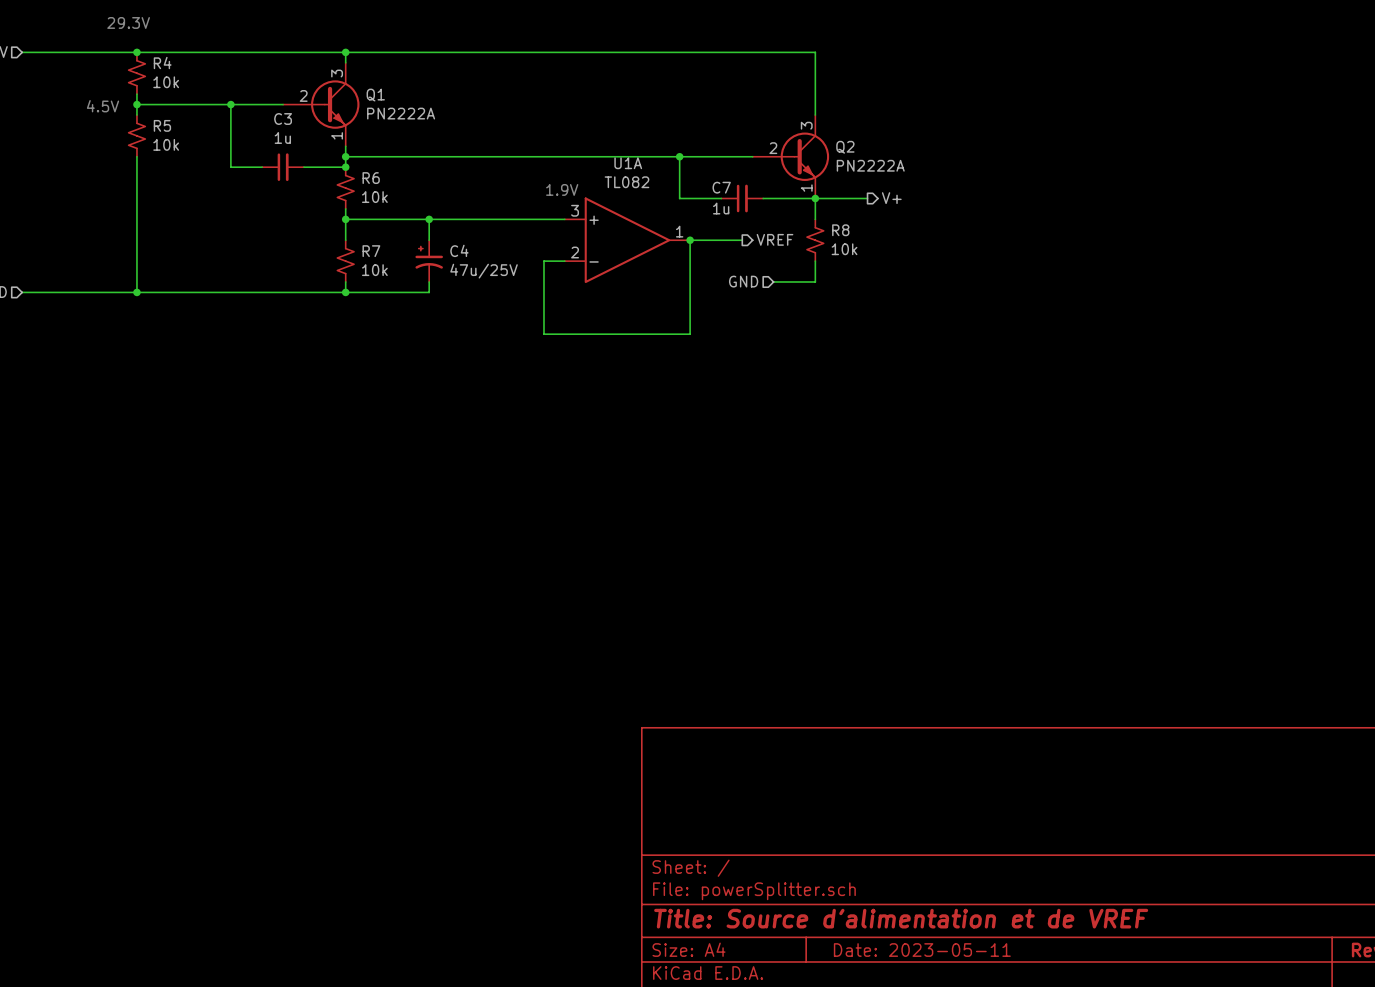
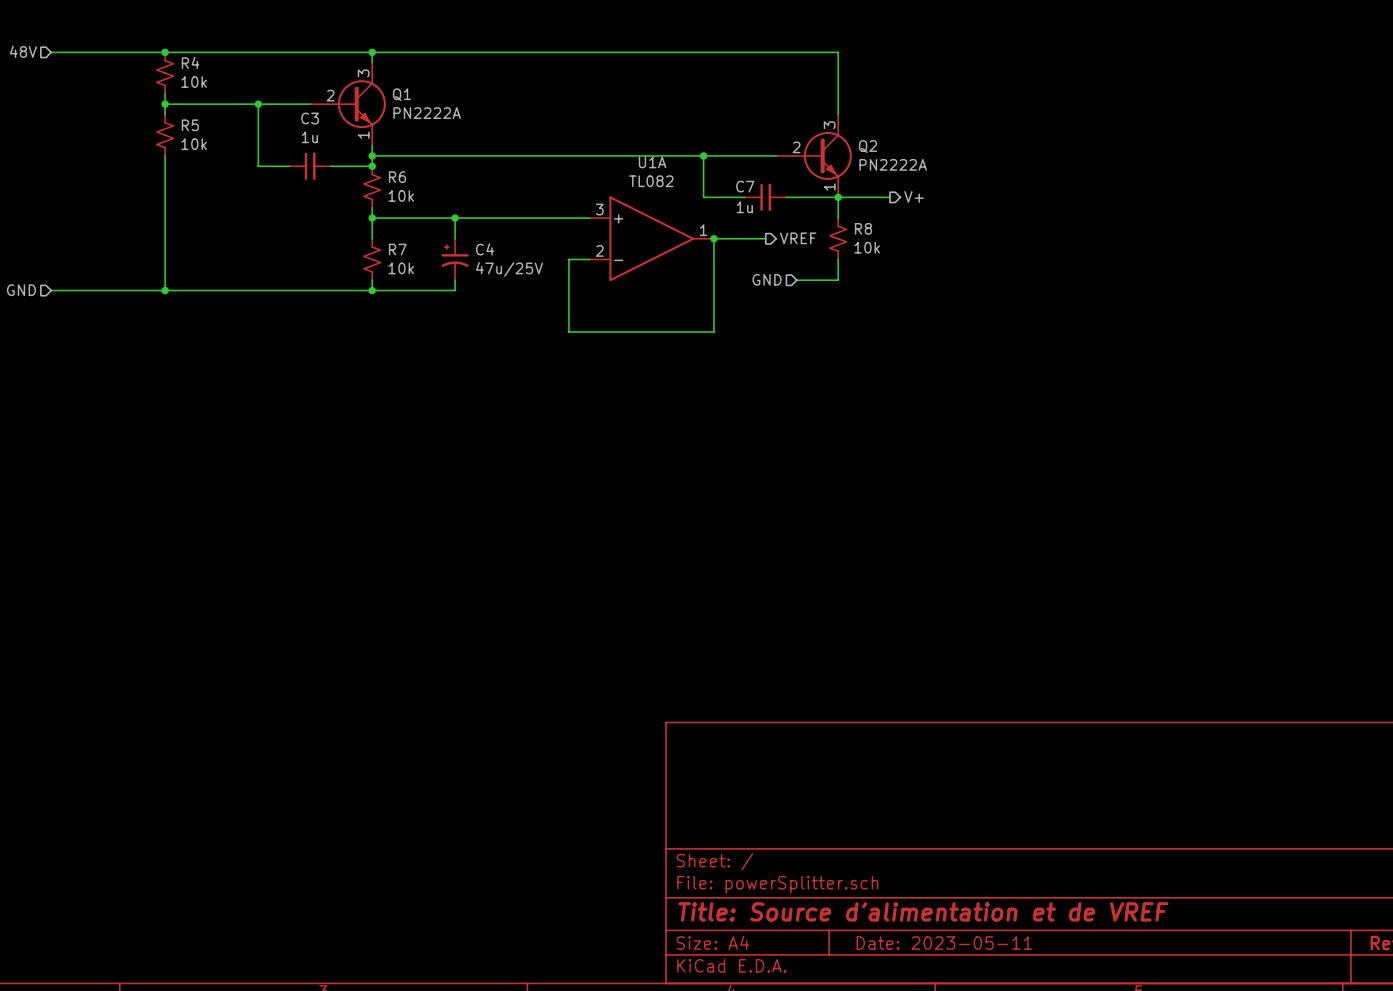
text: 29.3V (128, 22) -> none
text: 4.5V (103, 106) -> none
text: 1.9V (562, 189) -> none

